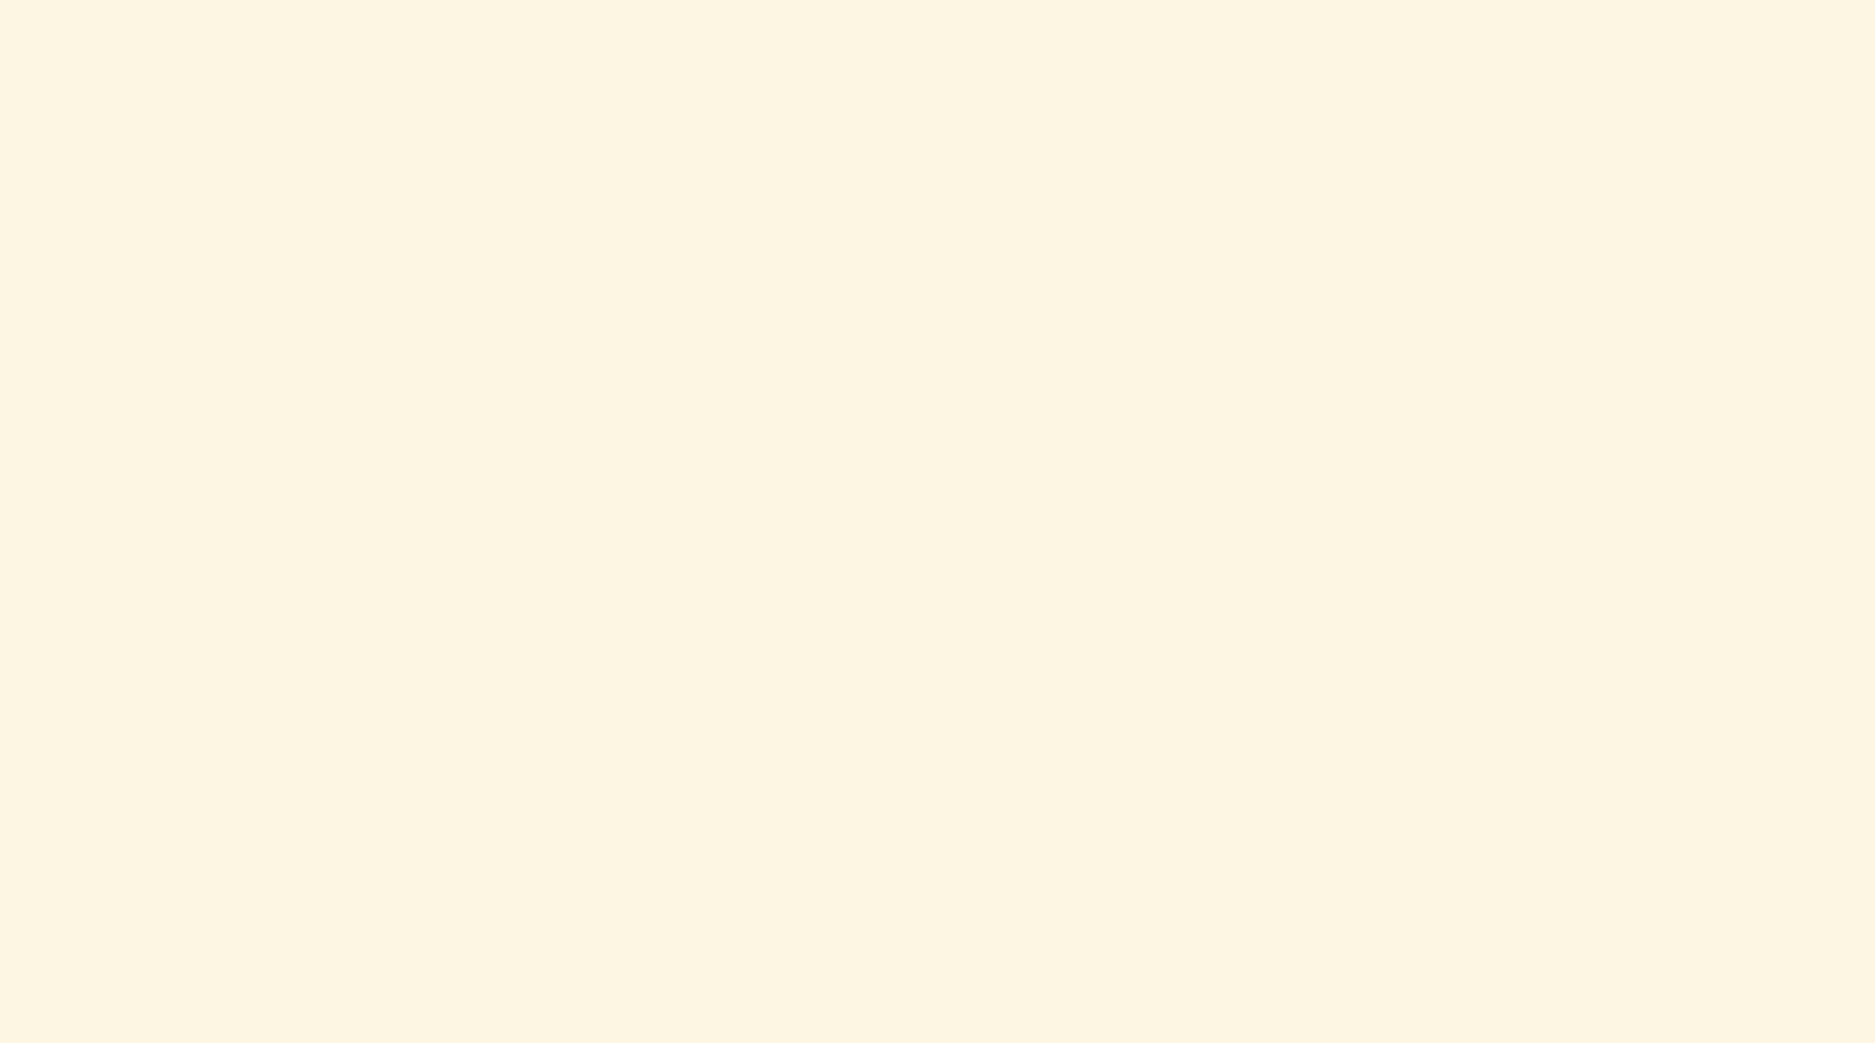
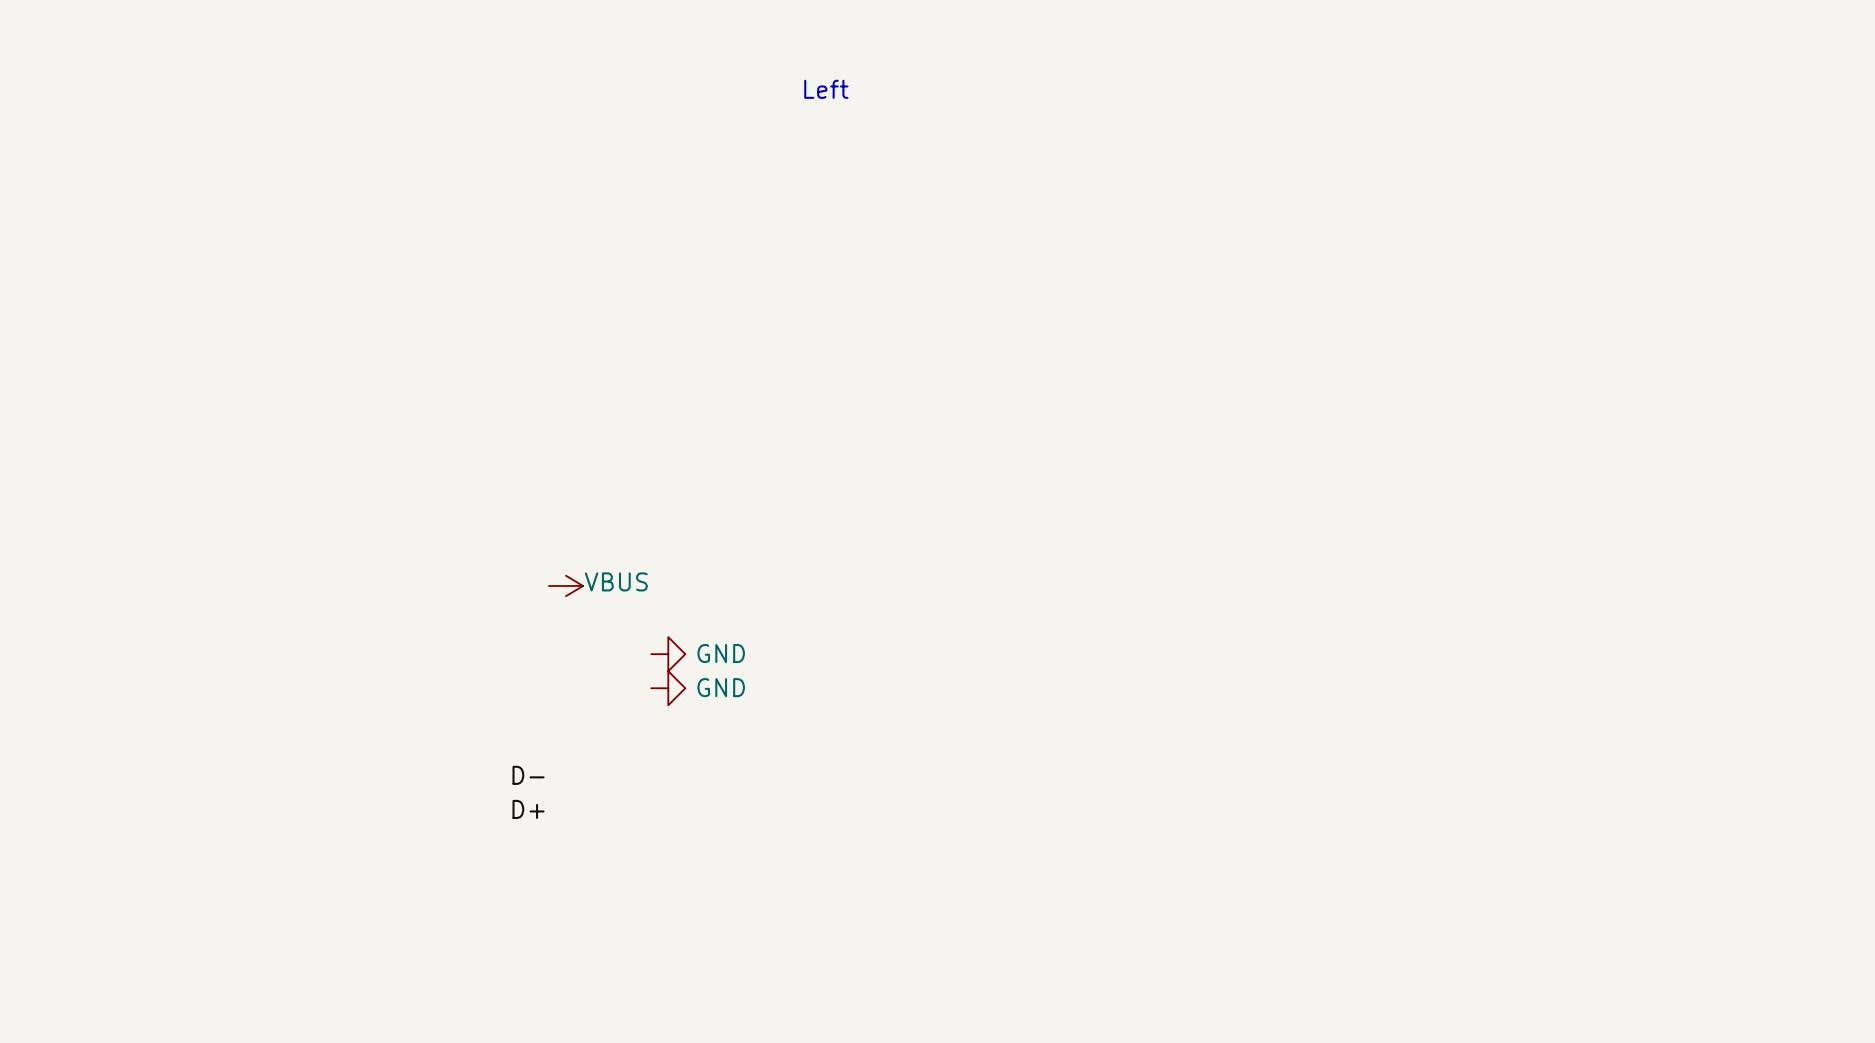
text: none -> Left (826, 89)
power symbol: none -> VBUS (566, 585)
power symbol: none -> GND (668, 654)
power symbol: none -> GND (668, 688)
label: none -> D- (528, 775)
label: none -> D+ (528, 809)

